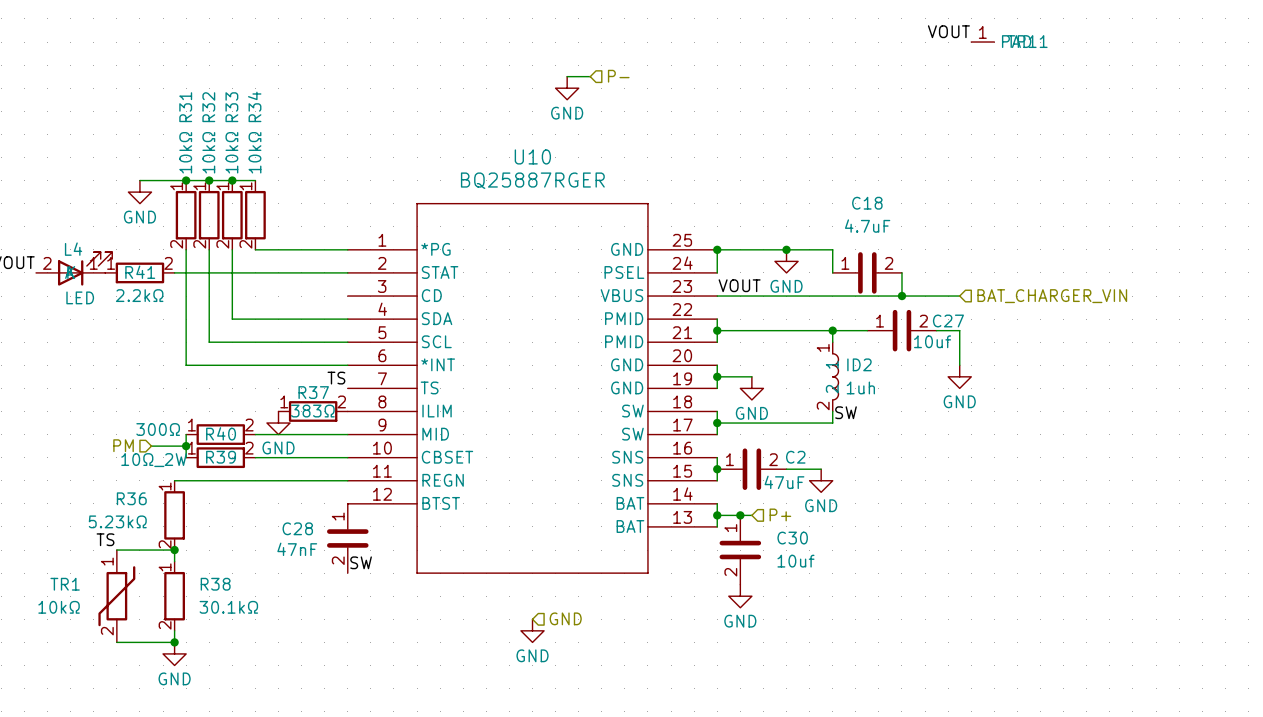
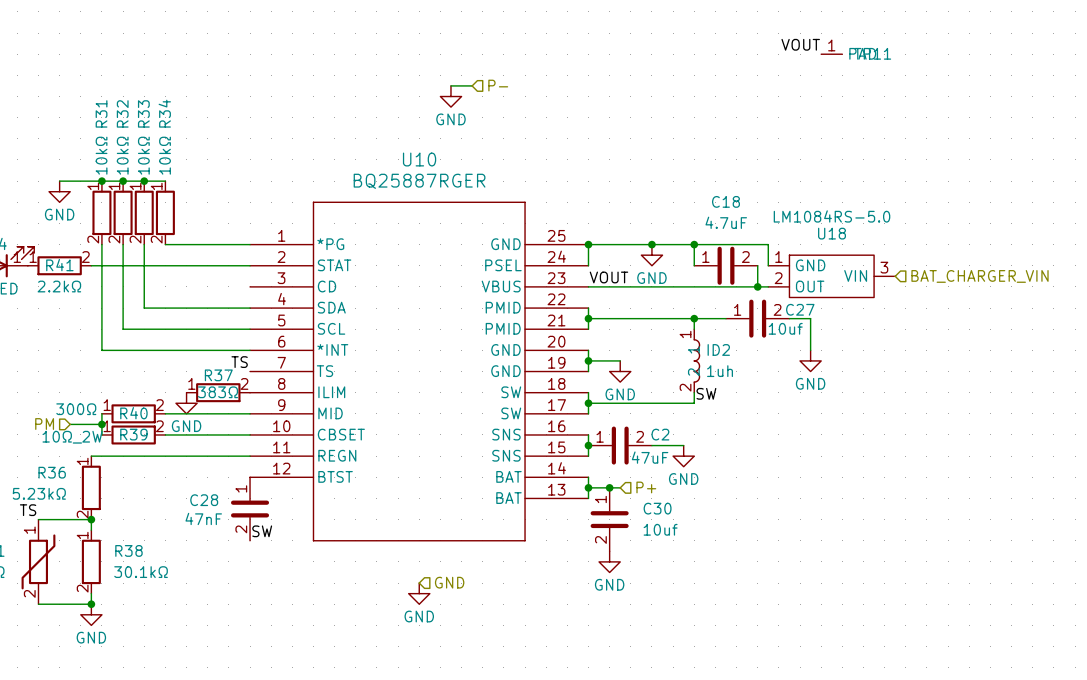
wire: none -> (694, 244) (768, 244) (768, 265)
junction: none -> (694, 244)
U18: none -> LM1084RS-5.0 (831, 276)
hierarchical label position: BAT_CHARGER_VIN (1052, 296) -> BAT_CHARGER_VIN (980, 276)

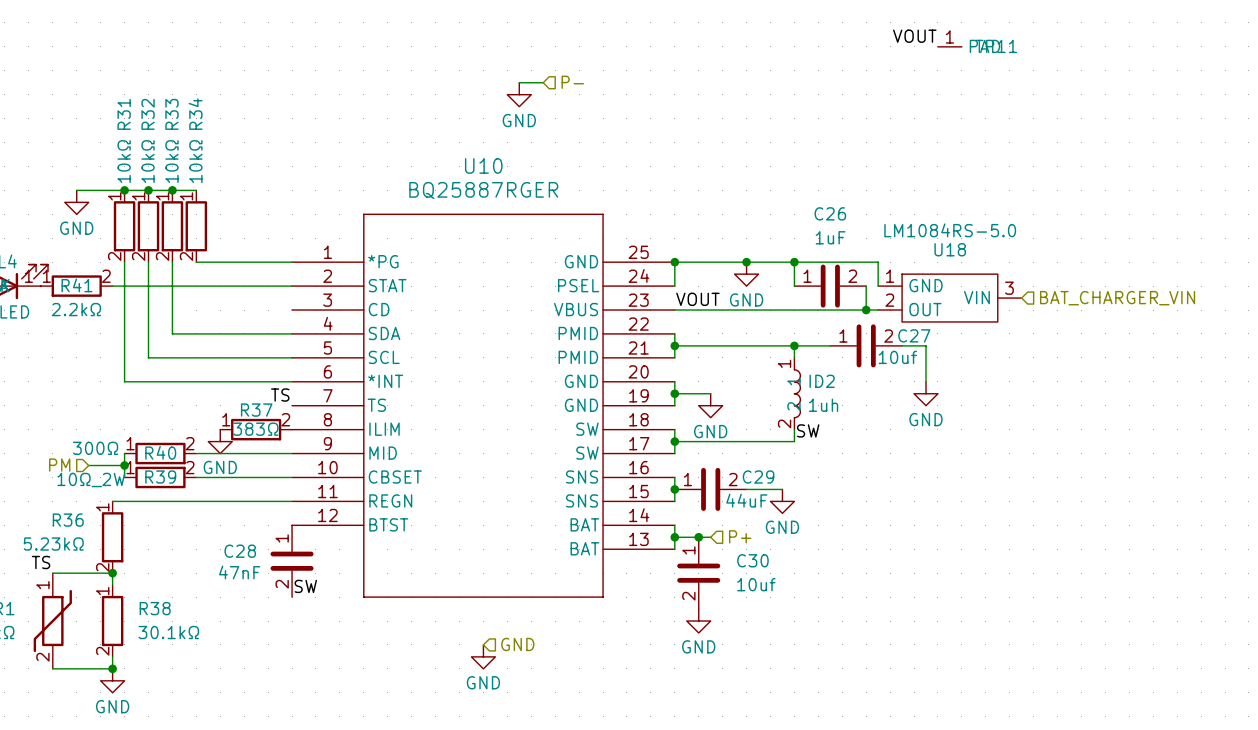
C18 name: C18 (725, 201) -> C26 (830, 213)
C18 value: 4.7uF (726, 222) -> 1uF (830, 237)
C2 name: C2 (660, 434) -> C29 (758, 477)
C2 value: 47uF (650, 457) -> 44uF (746, 500)

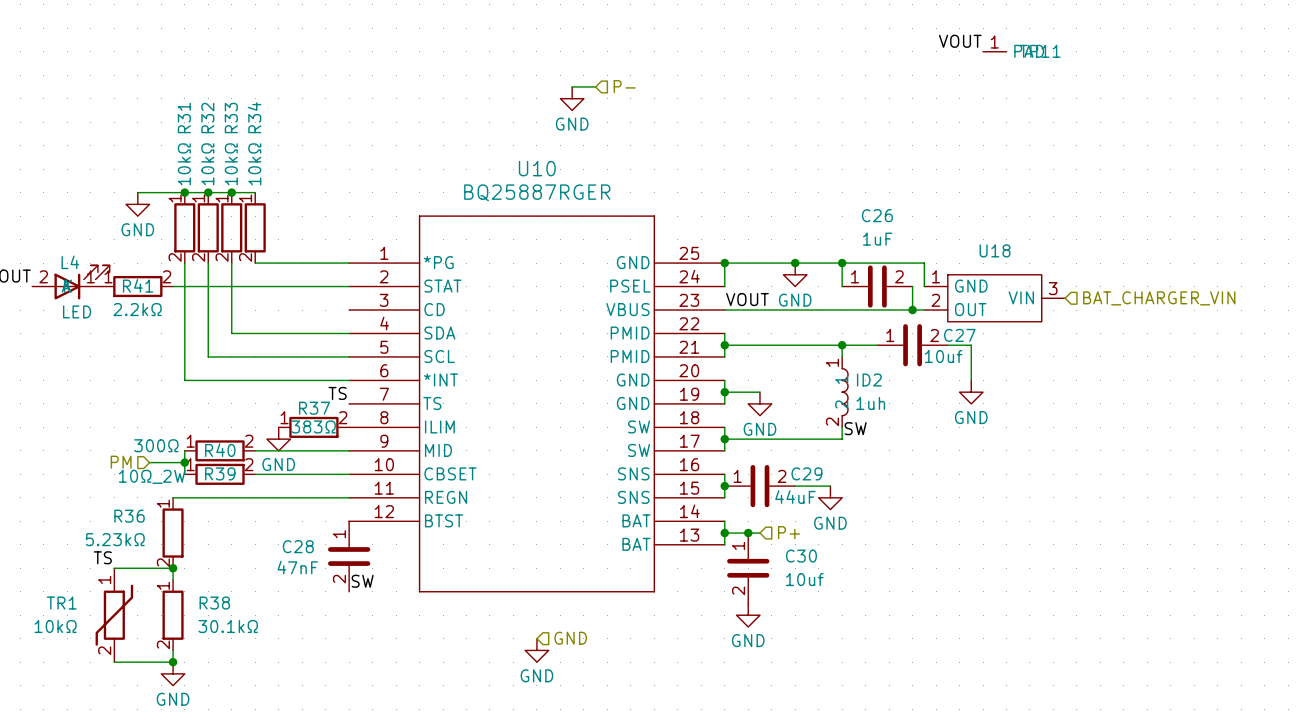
U18 value: LM1084RS-5.0 (950, 230) -> none

